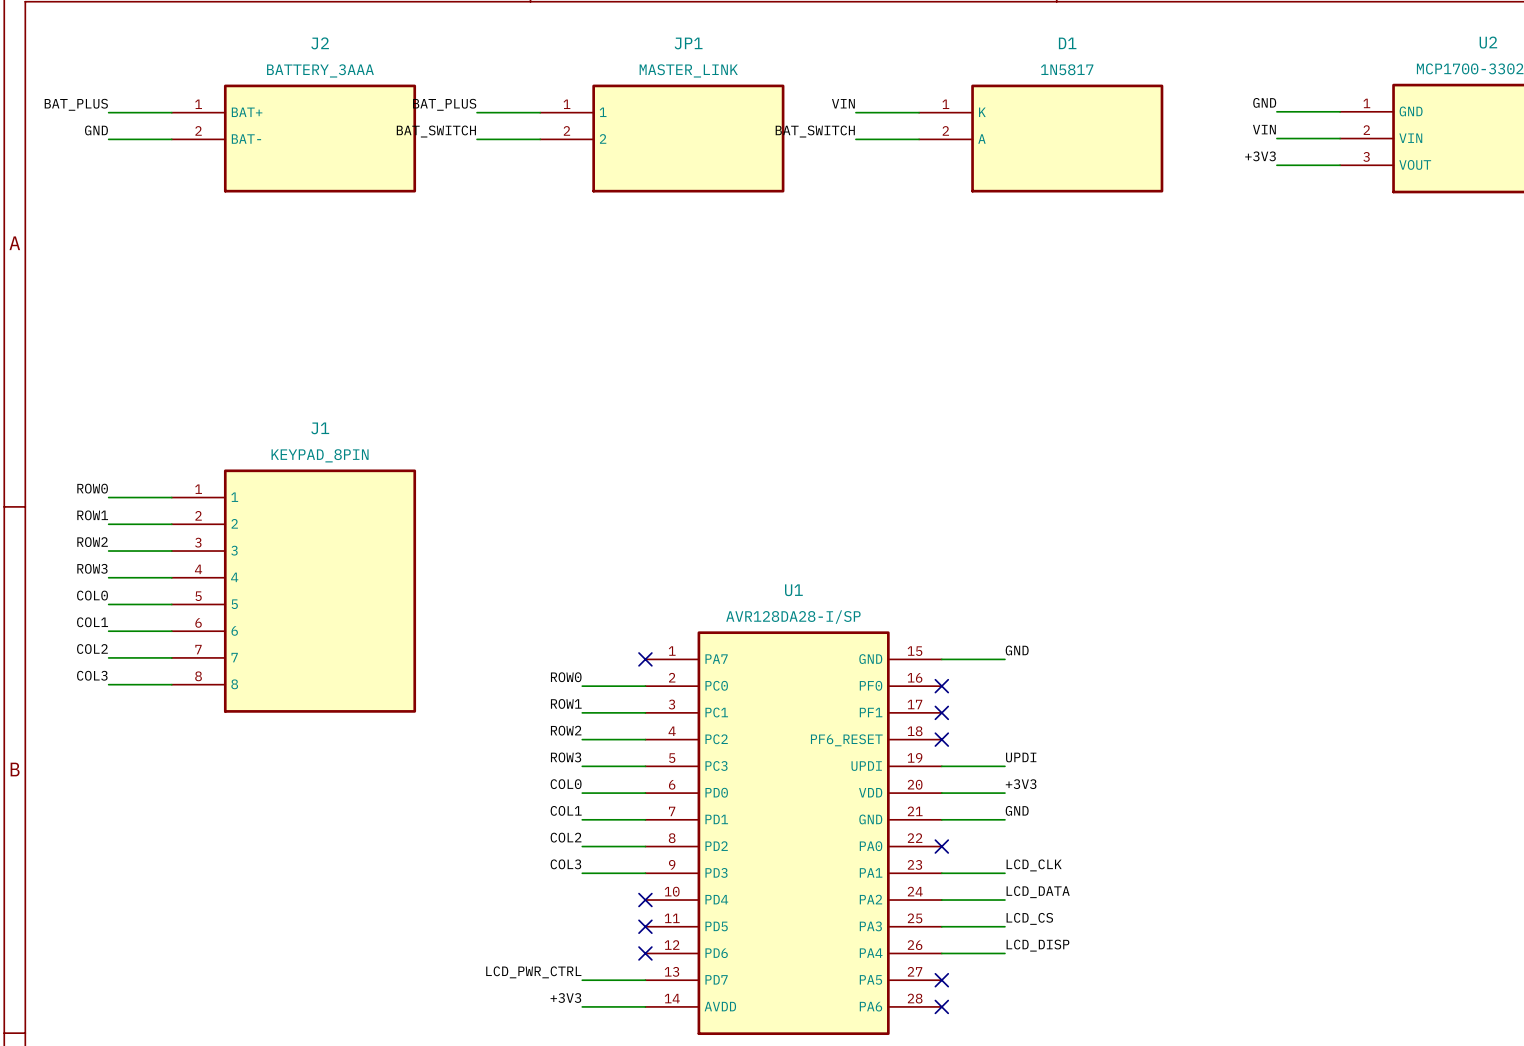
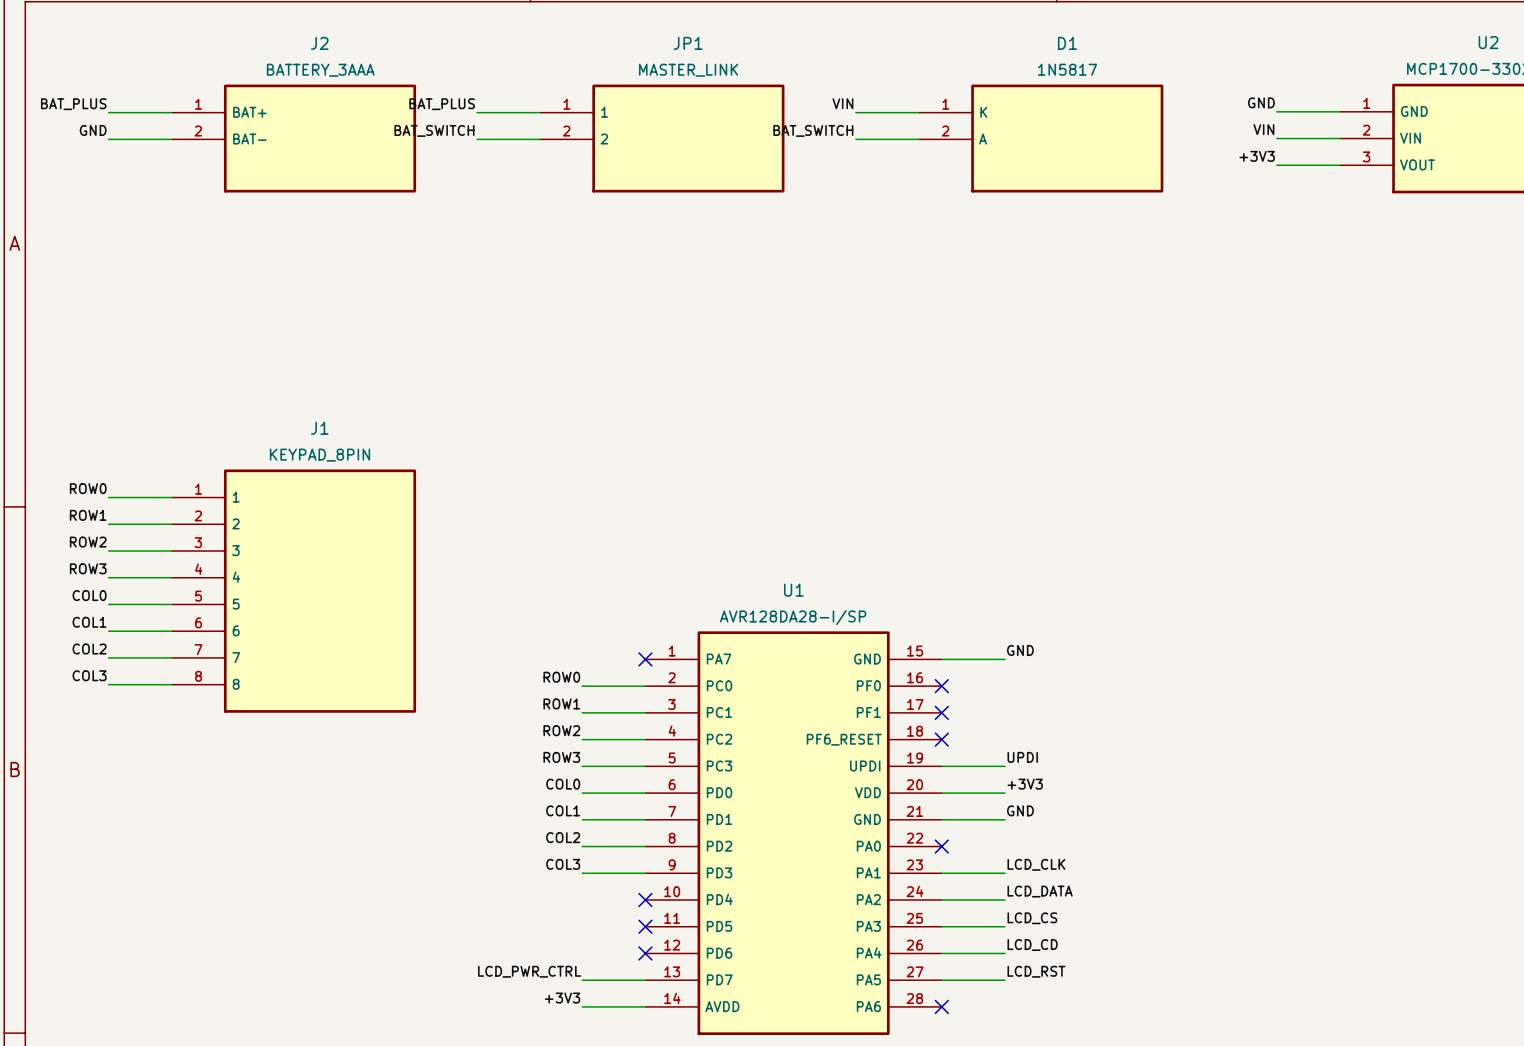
label: LCD_DISP (1037, 945) -> LCD_CD (1032, 945)
label: none -> LCD_RST (1036, 971)
wire: none -> (941, 980) (1004, 980)
no-connect mark: (941, 980) -> none

